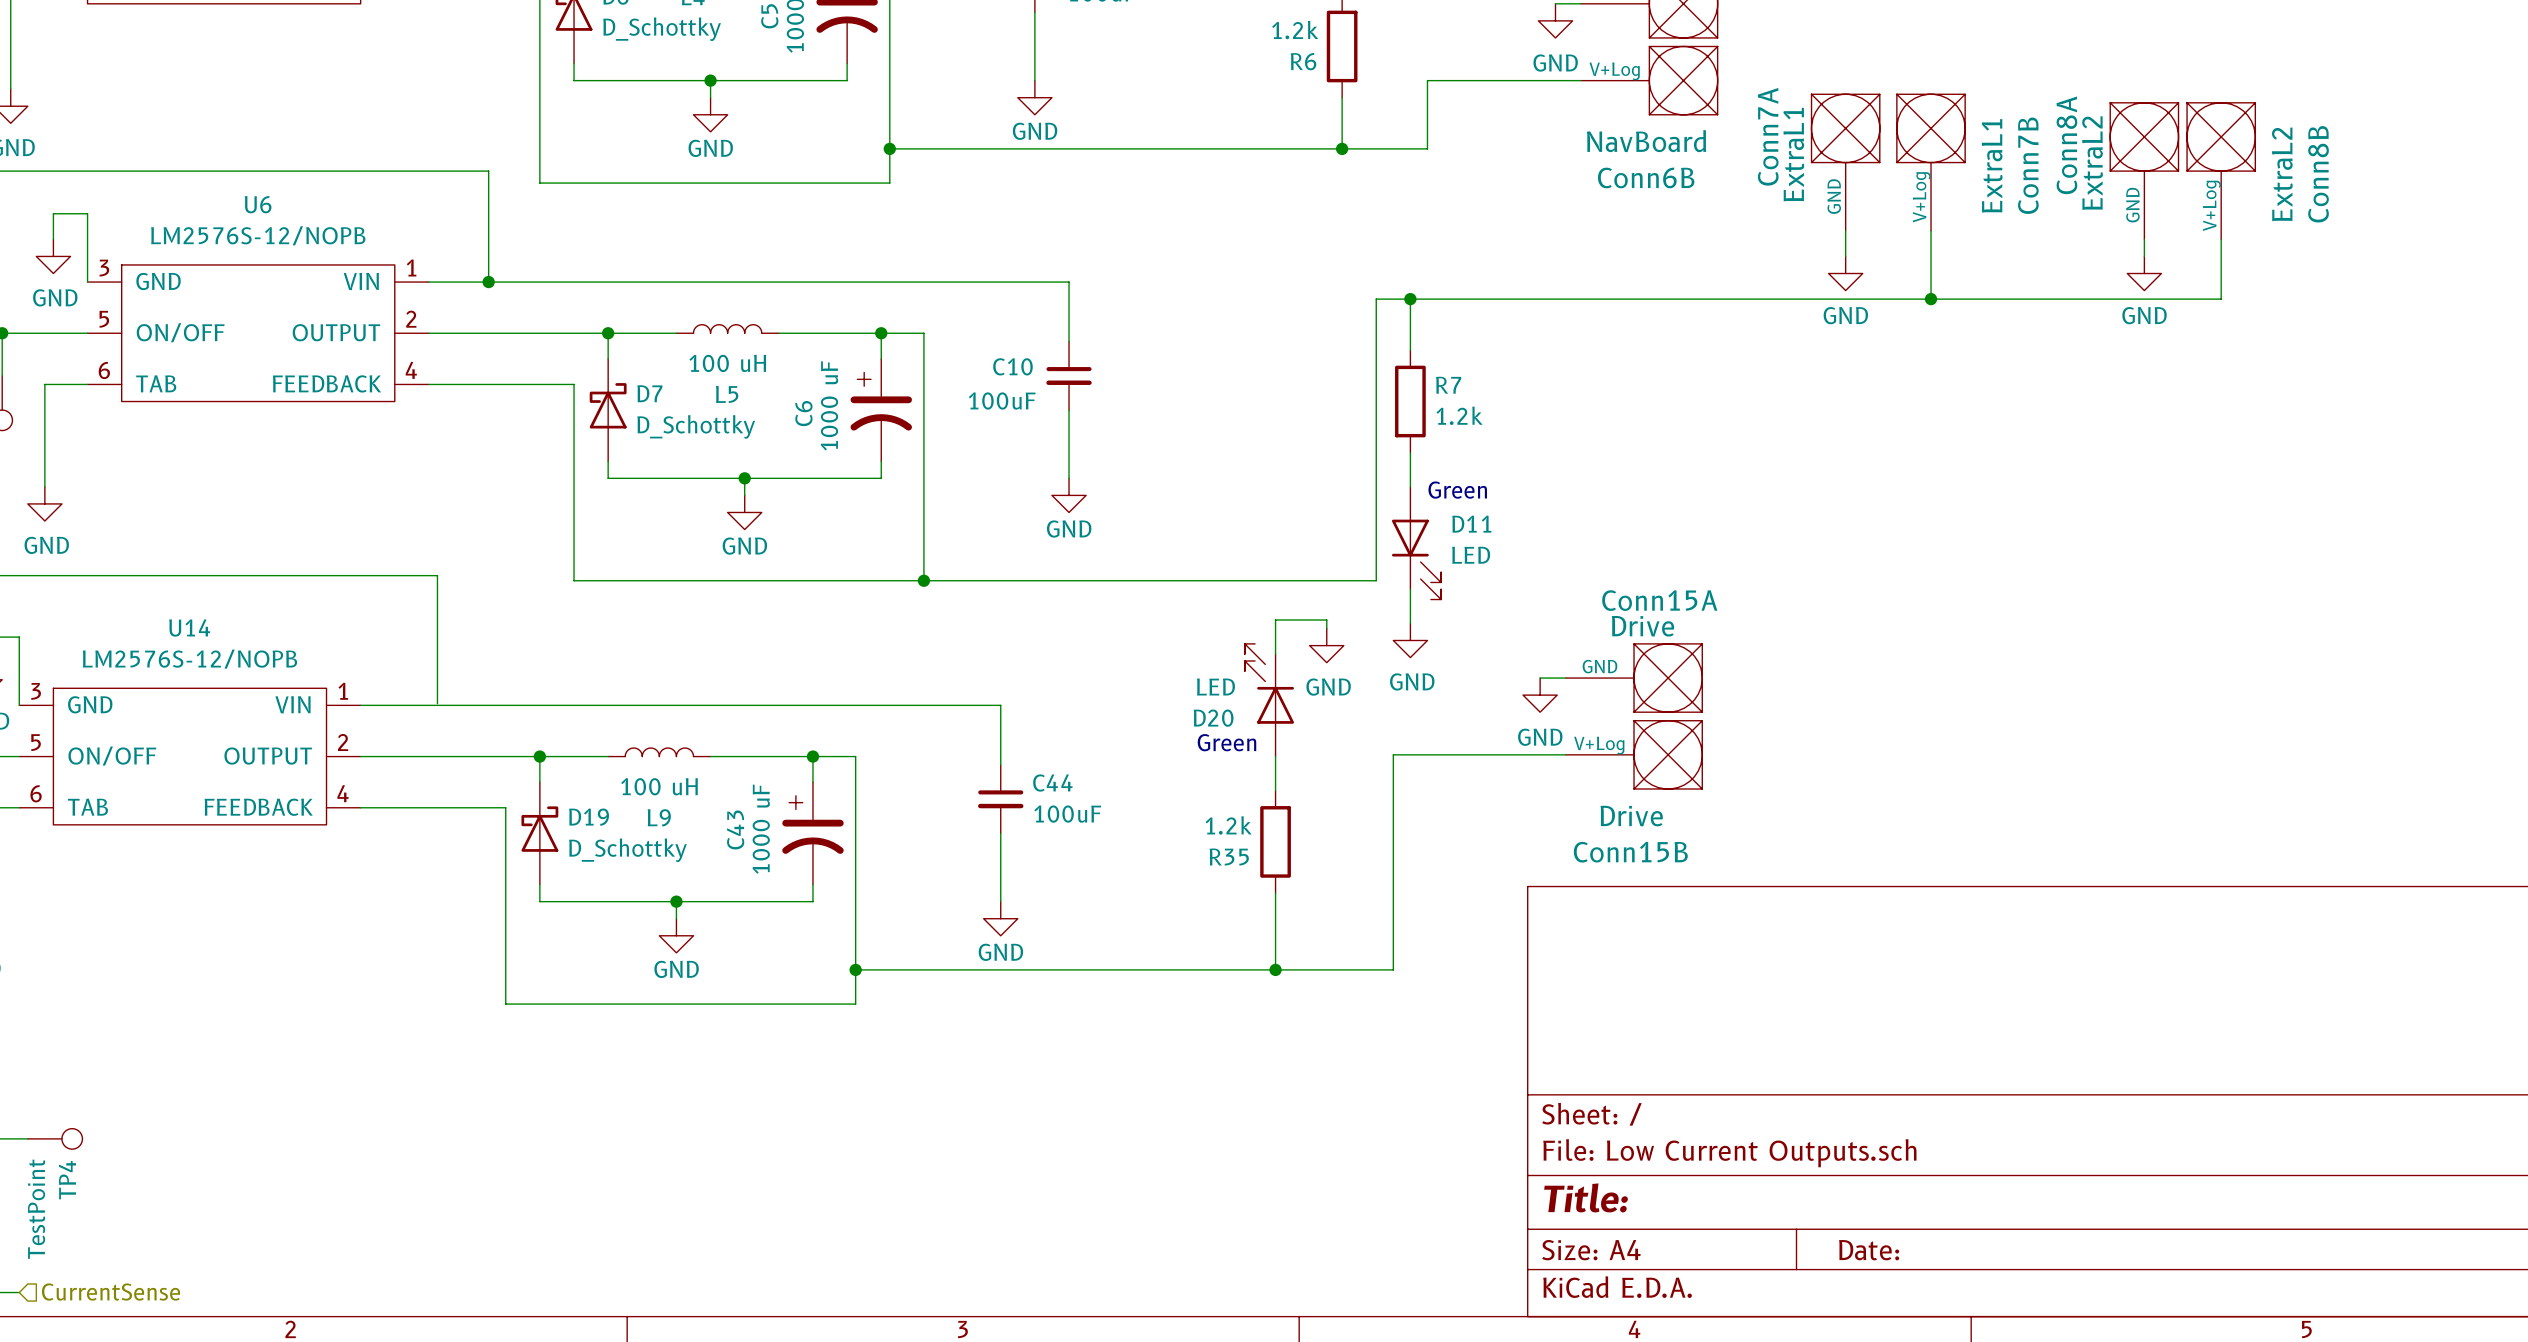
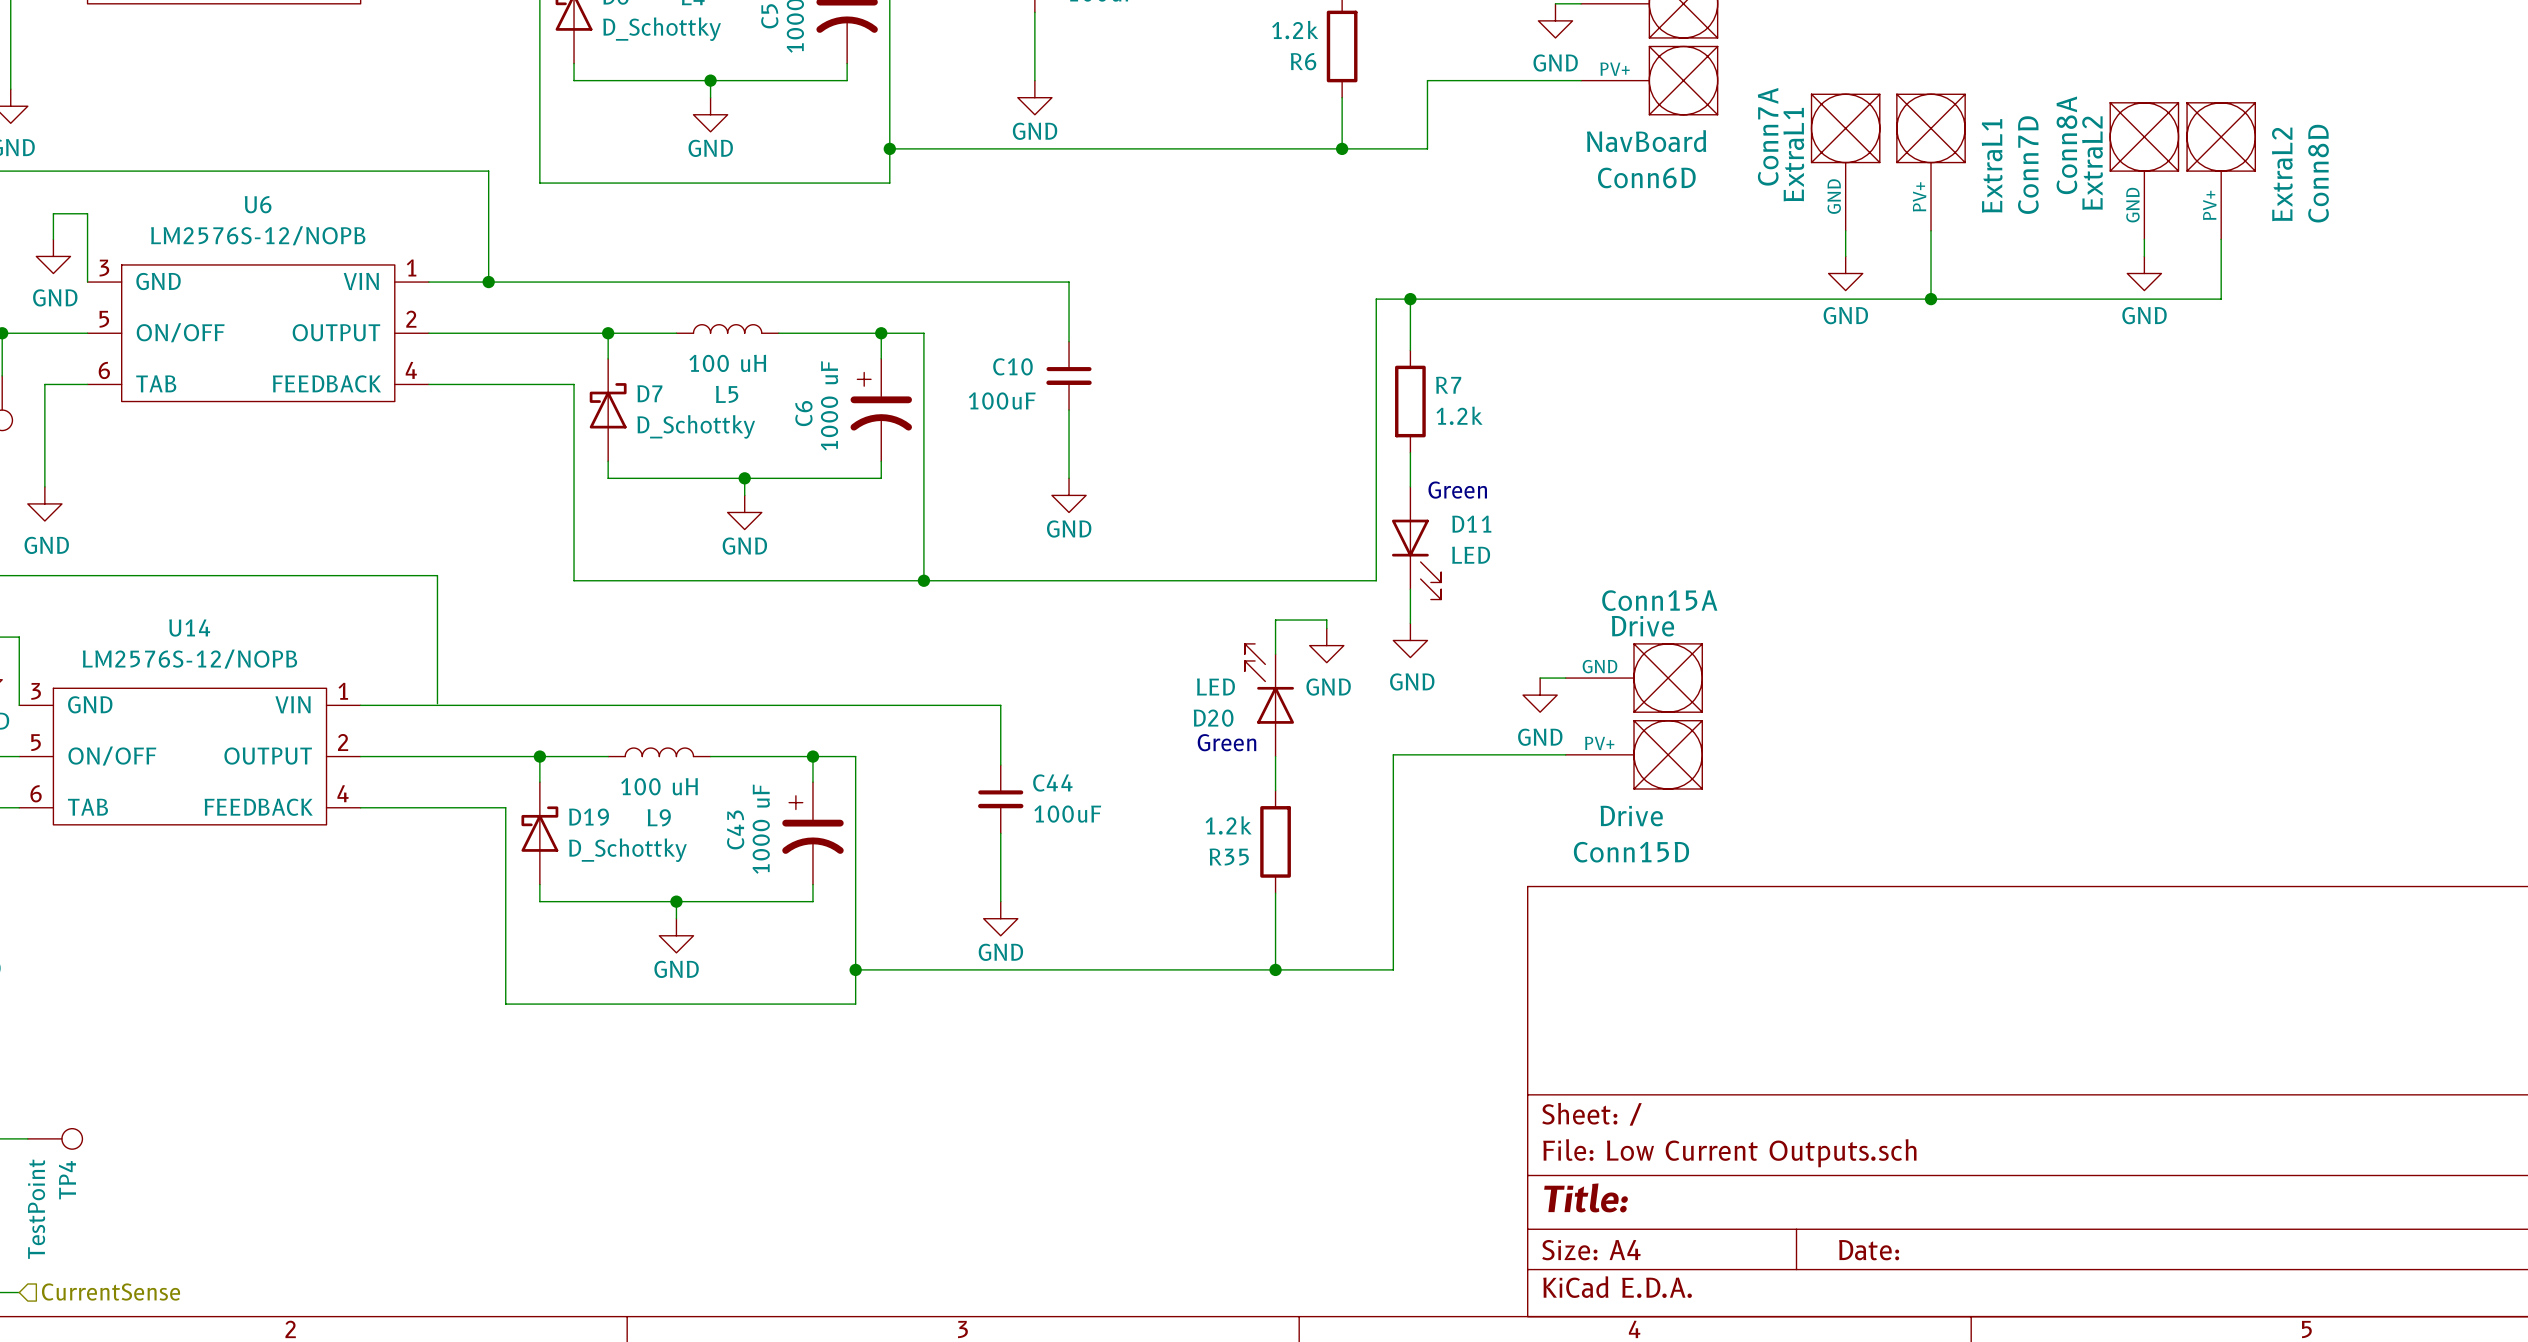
Conn6B pin name: V+Log (1614, 71) -> PV+ (1615, 69)
Conn7B name: Conn7B (2028, 165) -> Conn7D (2028, 165)
Conn8B name: Conn8B (2318, 174) -> Conn8D (2318, 173)
Conn6B name: Conn6B (1646, 177) -> Conn6D (1646, 177)
Conn7B pin name: V+Log (1921, 197) -> PV+ (1919, 196)
Conn8B pin name: V+Log (2211, 205) -> PV+ (2209, 205)
Conn15B pin name: V+Log (1599, 745) -> PV+ (1599, 743)
Conn15B name: Conn15B (1630, 852) -> Conn15D (1631, 852)

